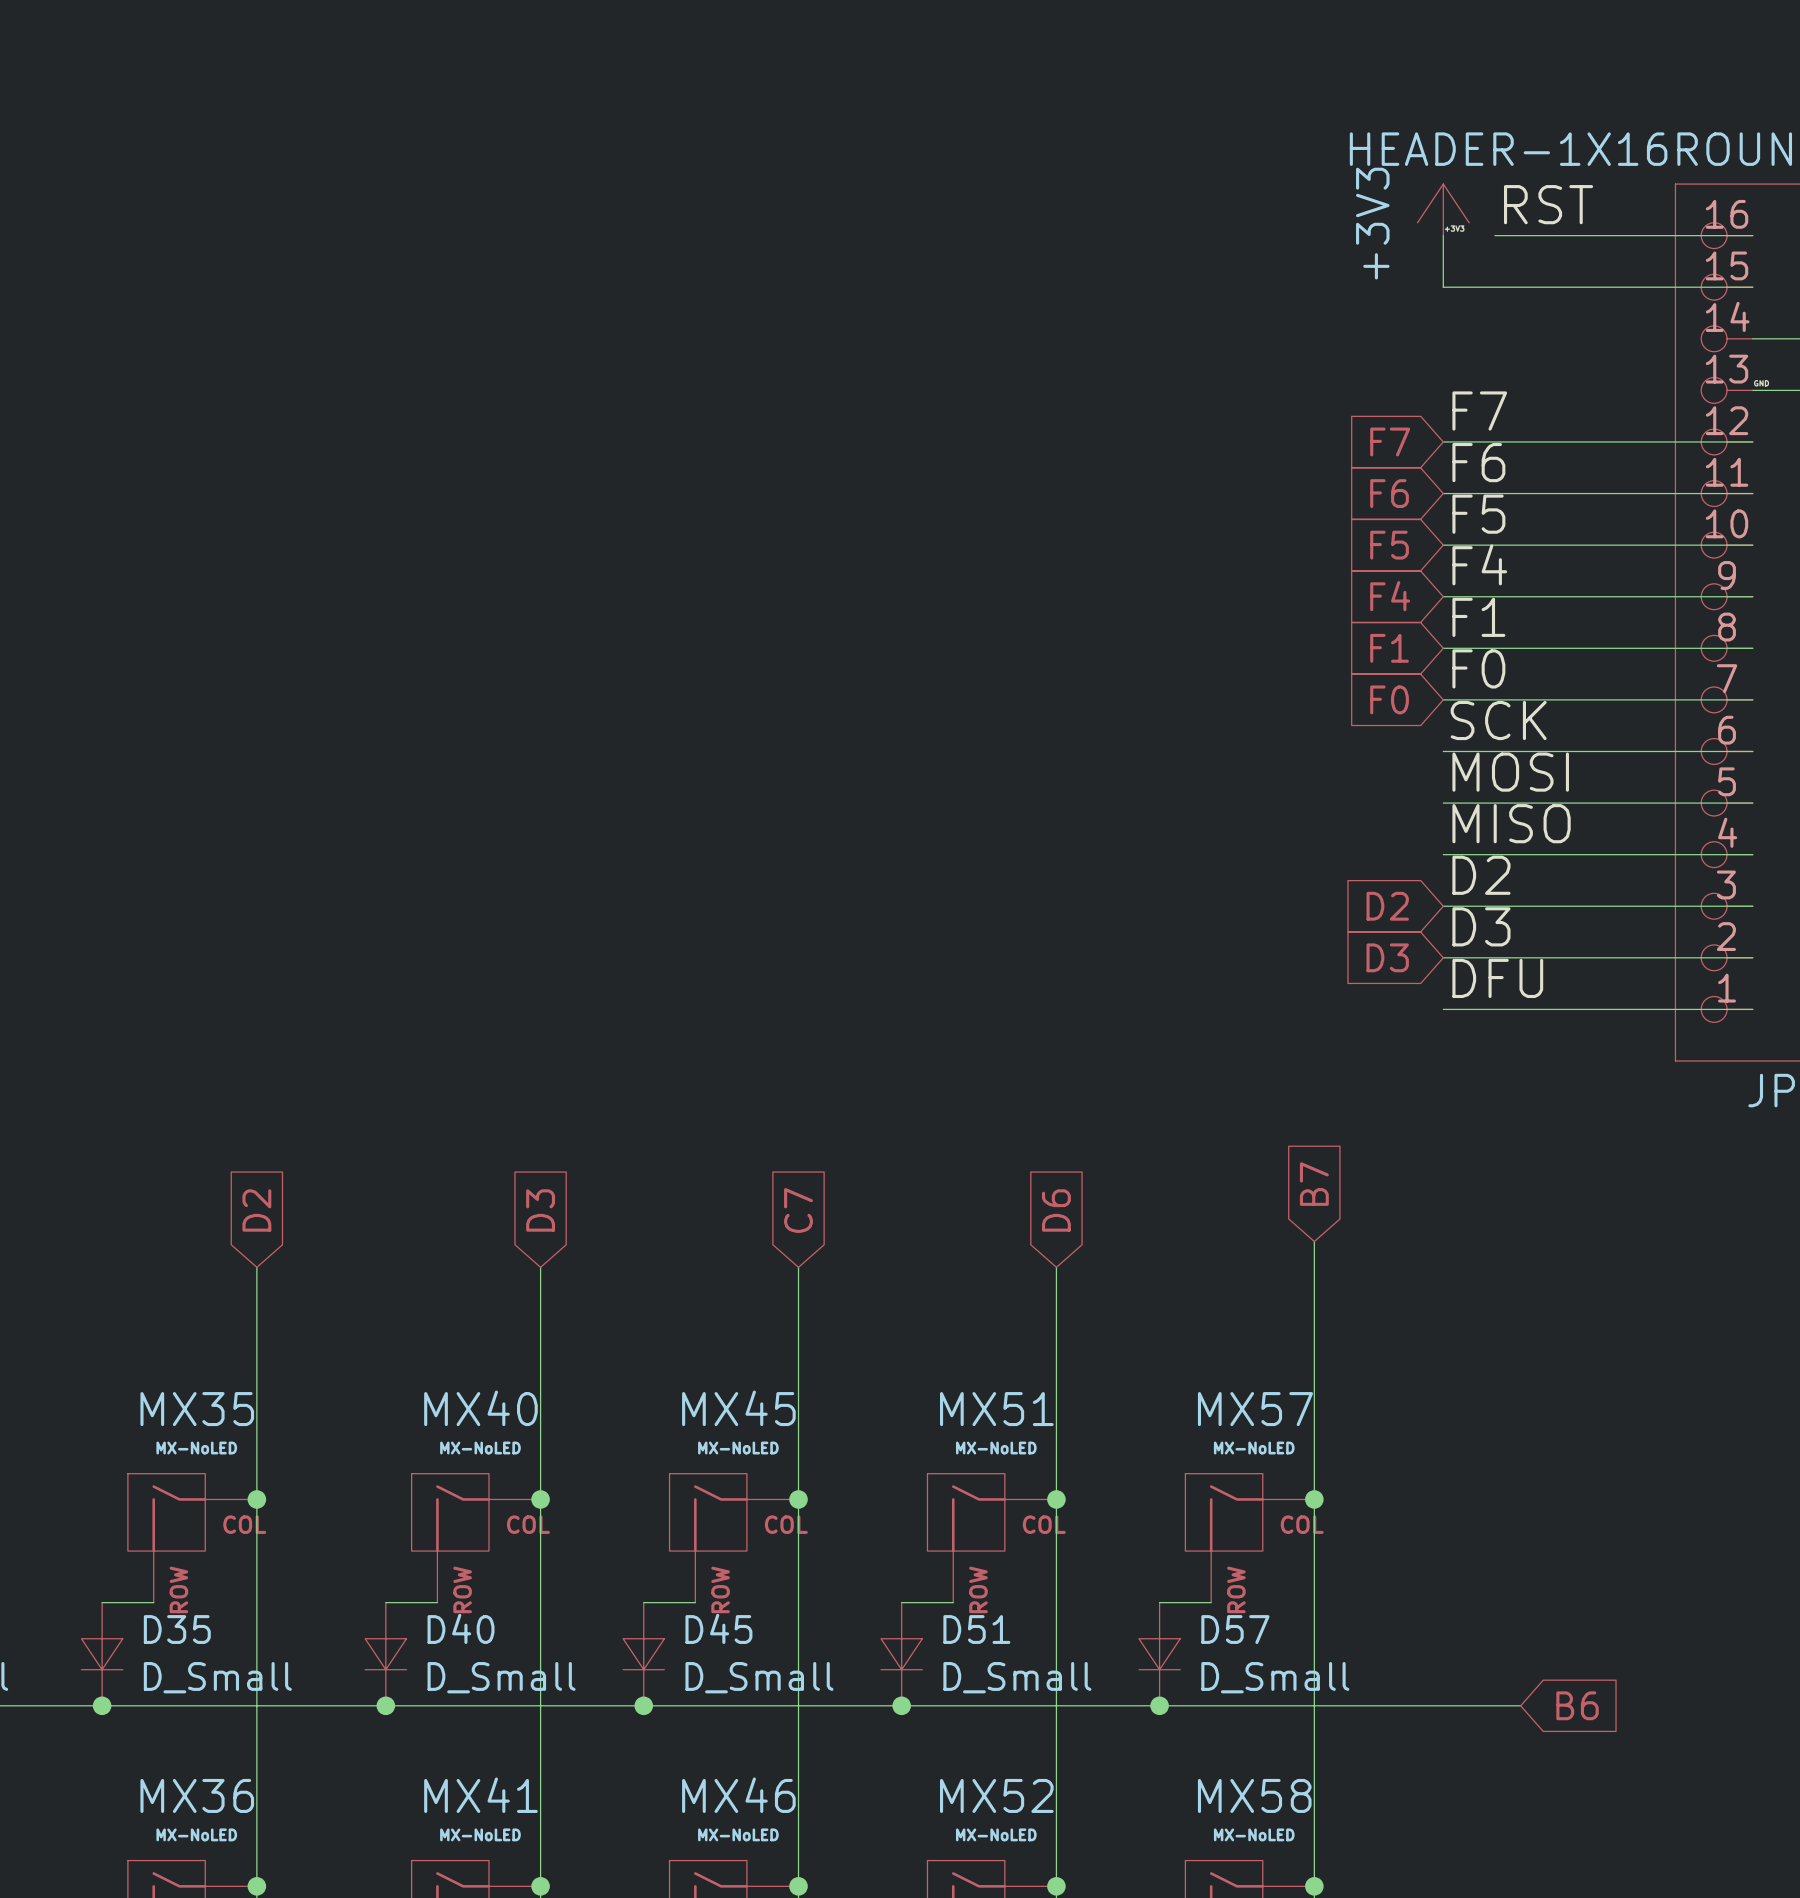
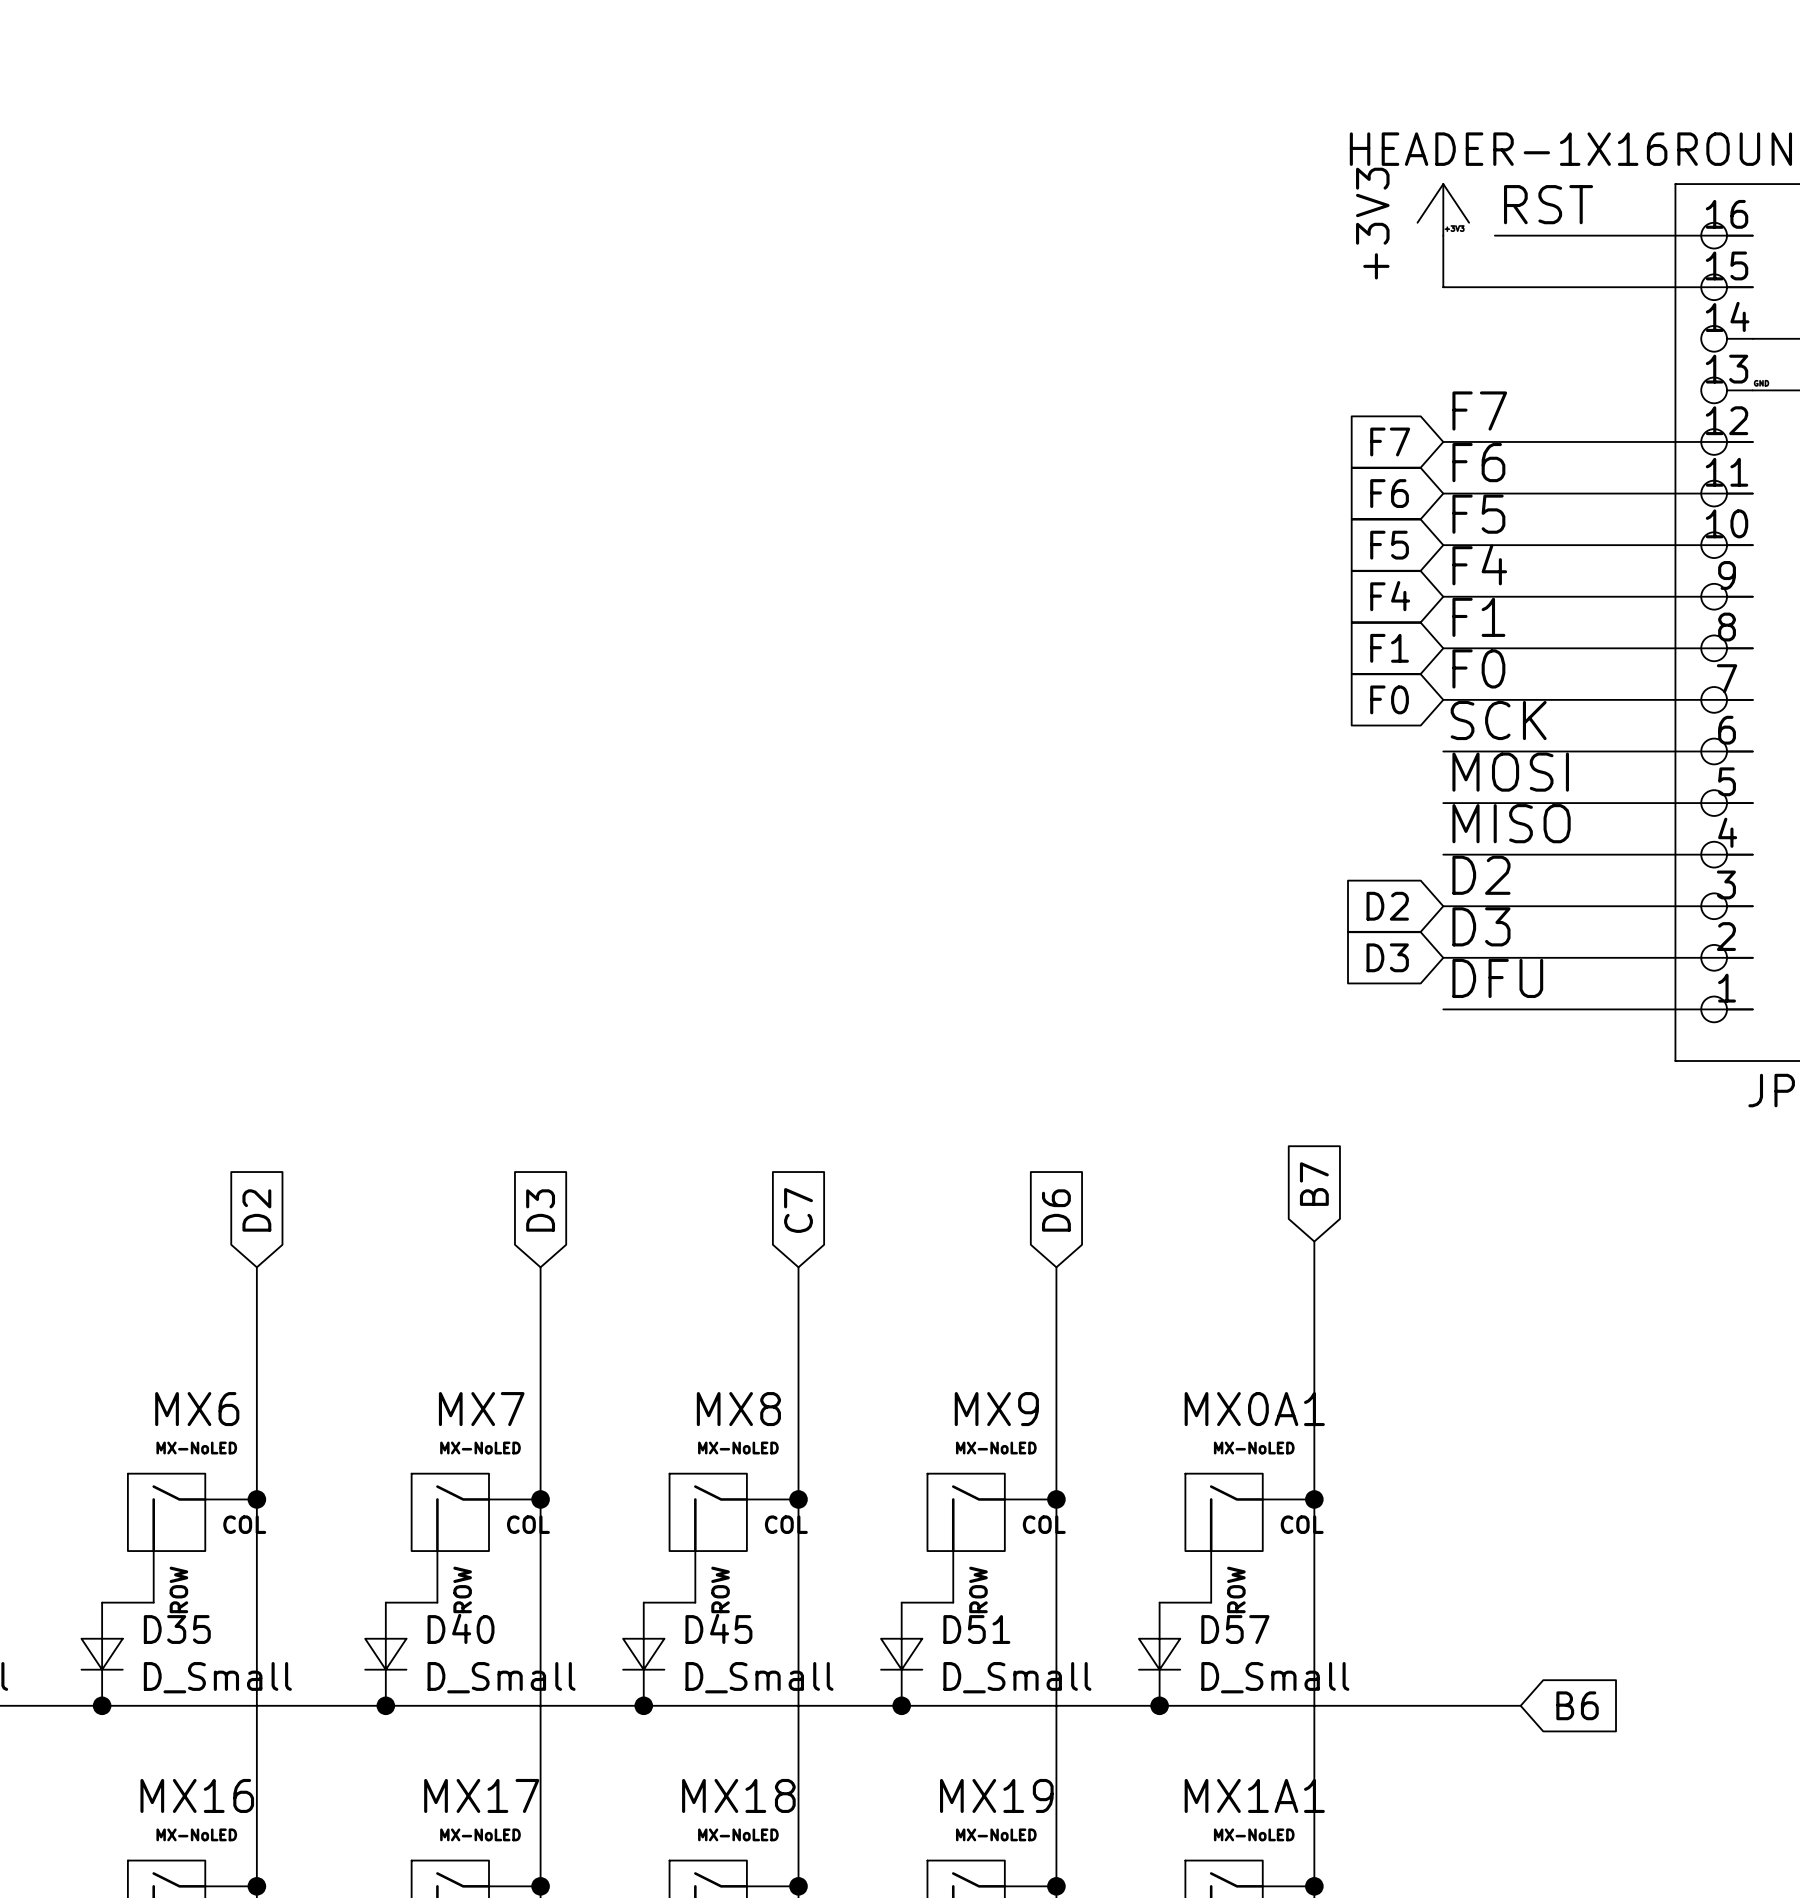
MX40 name: MX40 (480, 1408) -> MX7 (481, 1409)
MX45 name: MX45 (738, 1408) -> MX8 (738, 1409)
MX35 name: MX35 (197, 1409) -> MX6 (197, 1409)
MX51 name: MX51 (996, 1409) -> MX9 (996, 1409)
MX57 name: MX57 (1255, 1409) -> MX0A1 (1254, 1409)
MX36 name: MX36 (197, 1795) -> MX16 (197, 1795)
MX41 name: MX41 (480, 1795) -> MX17 (481, 1795)
MX46 name: MX46 (738, 1795) -> MX18 (738, 1795)
MX52 name: MX52 (996, 1795) -> MX19 (996, 1795)
MX58 name: MX58 (1254, 1795) -> MX1A1 (1254, 1795)

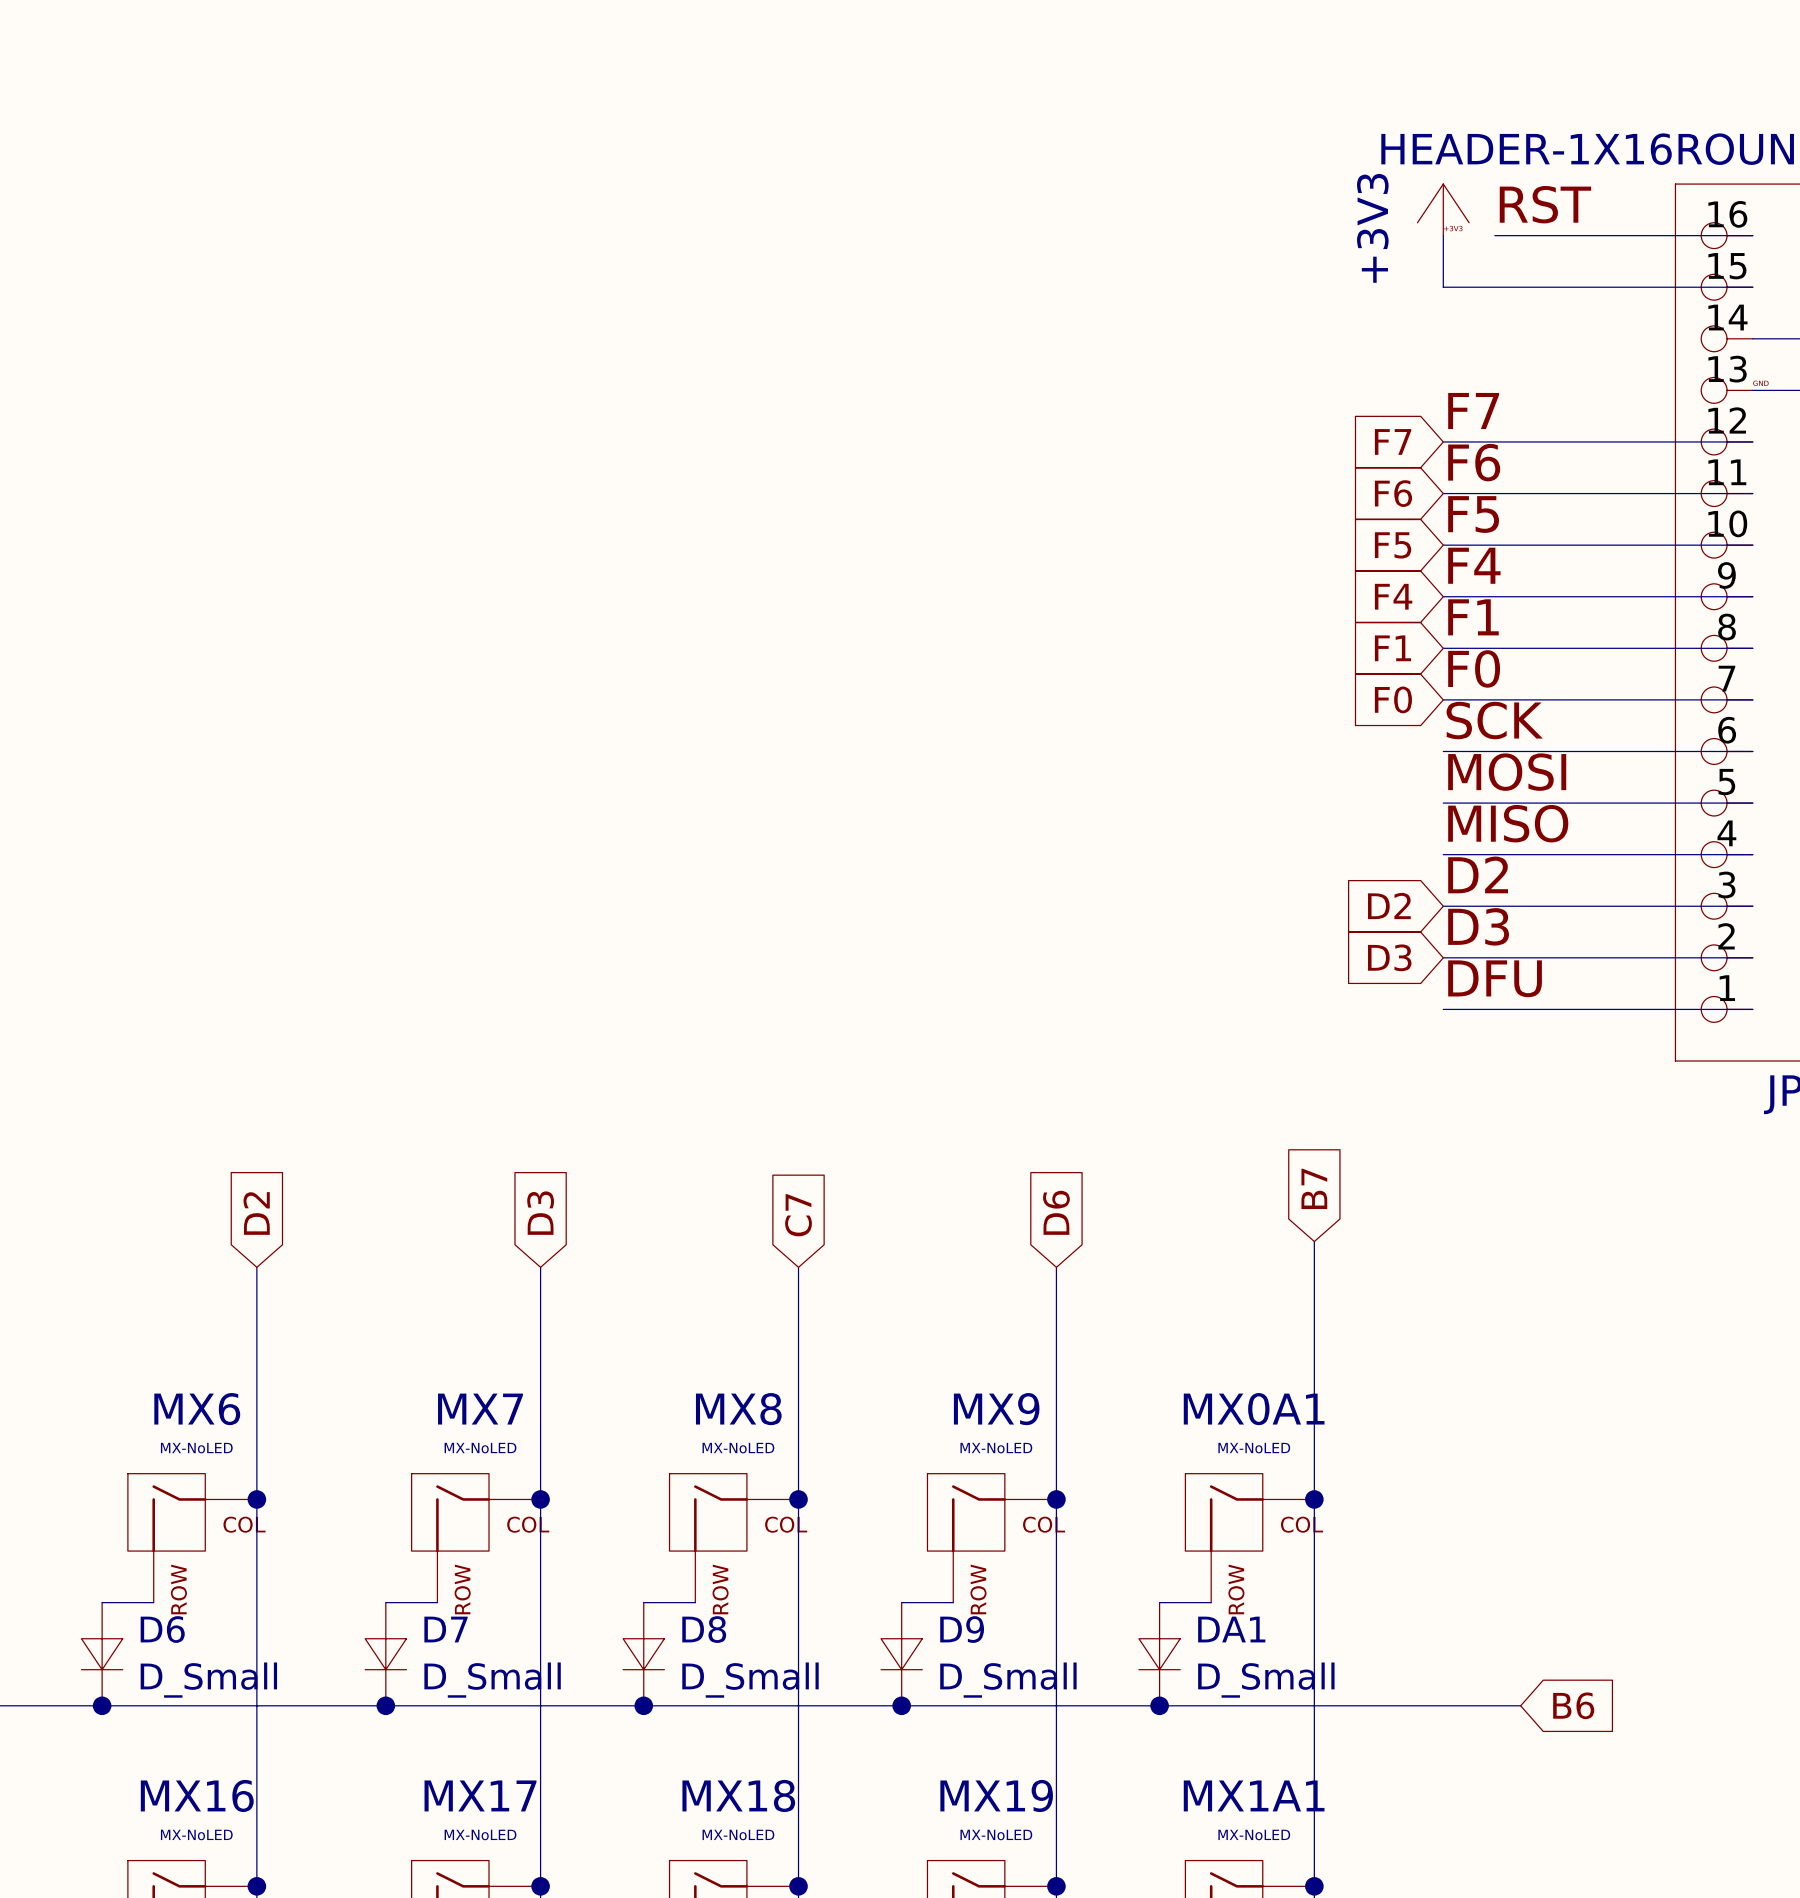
D40 name: D40 (461, 1628) -> D7 (446, 1629)
D45 name: D45 (718, 1628) -> D8 (704, 1629)
D35 name: D35 (177, 1629) -> D6 (162, 1629)
D51 name: D51 (976, 1629) -> D9 (962, 1629)
D57 name: D57 (1235, 1629) -> DA1 (1231, 1629)

